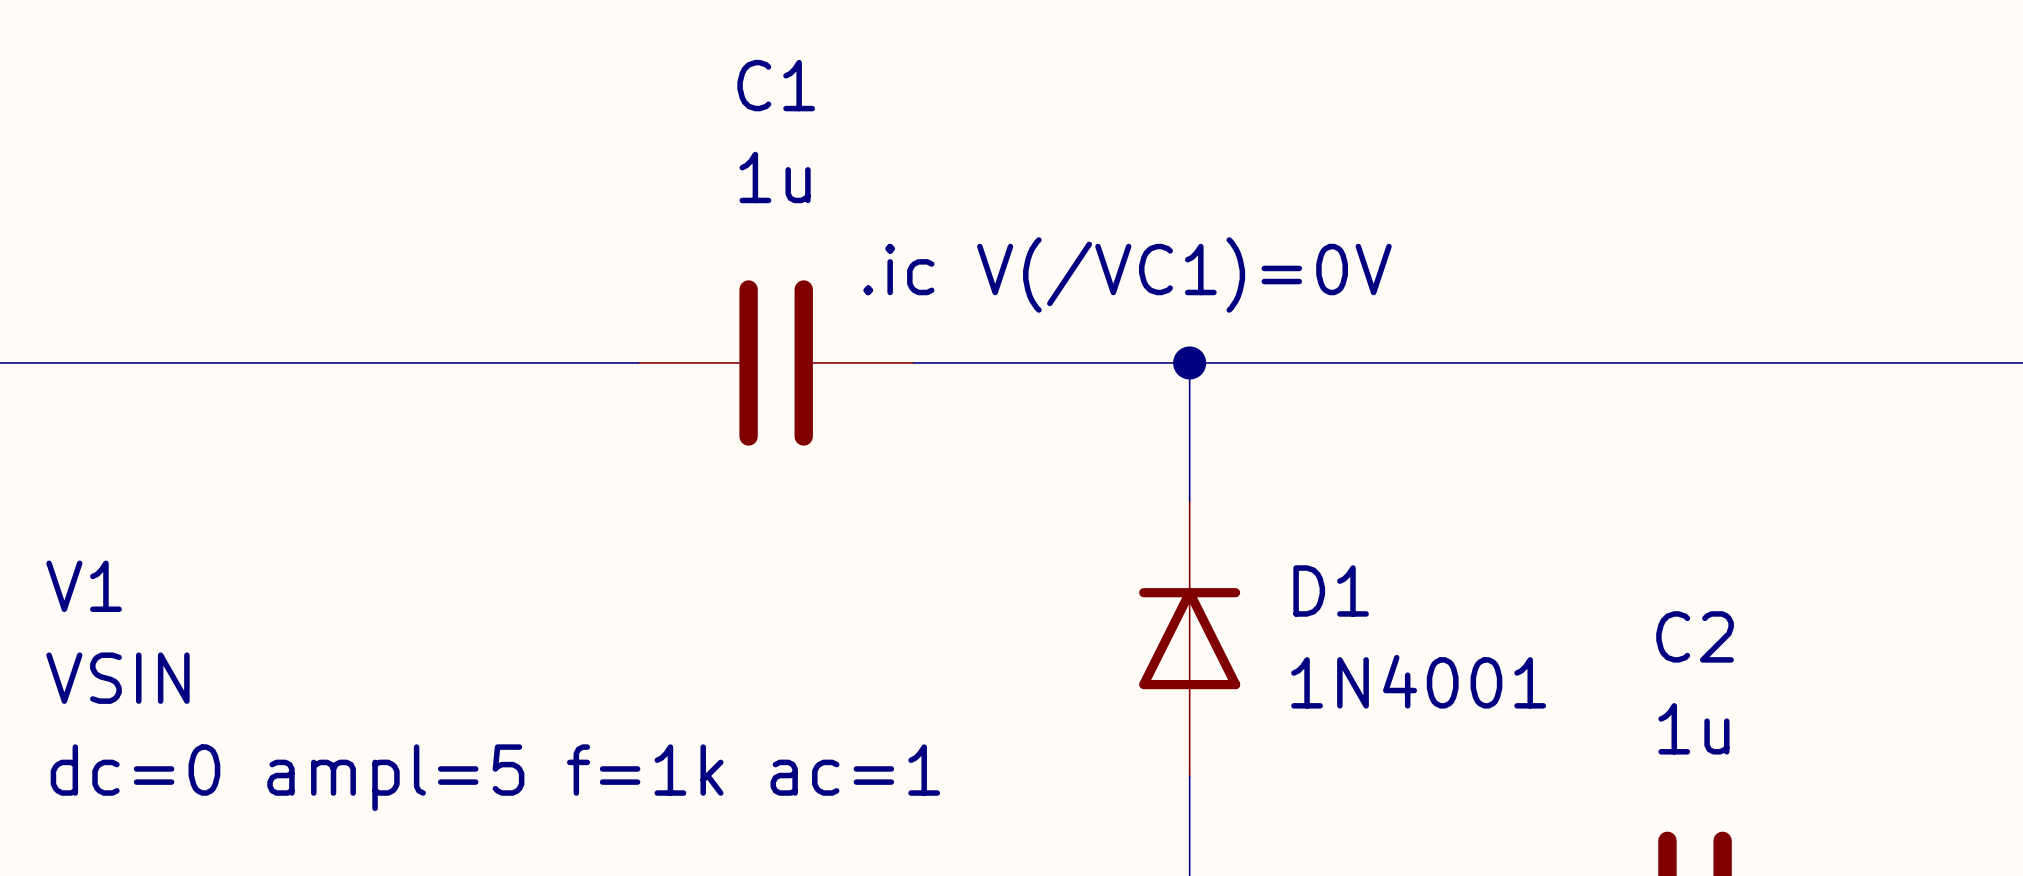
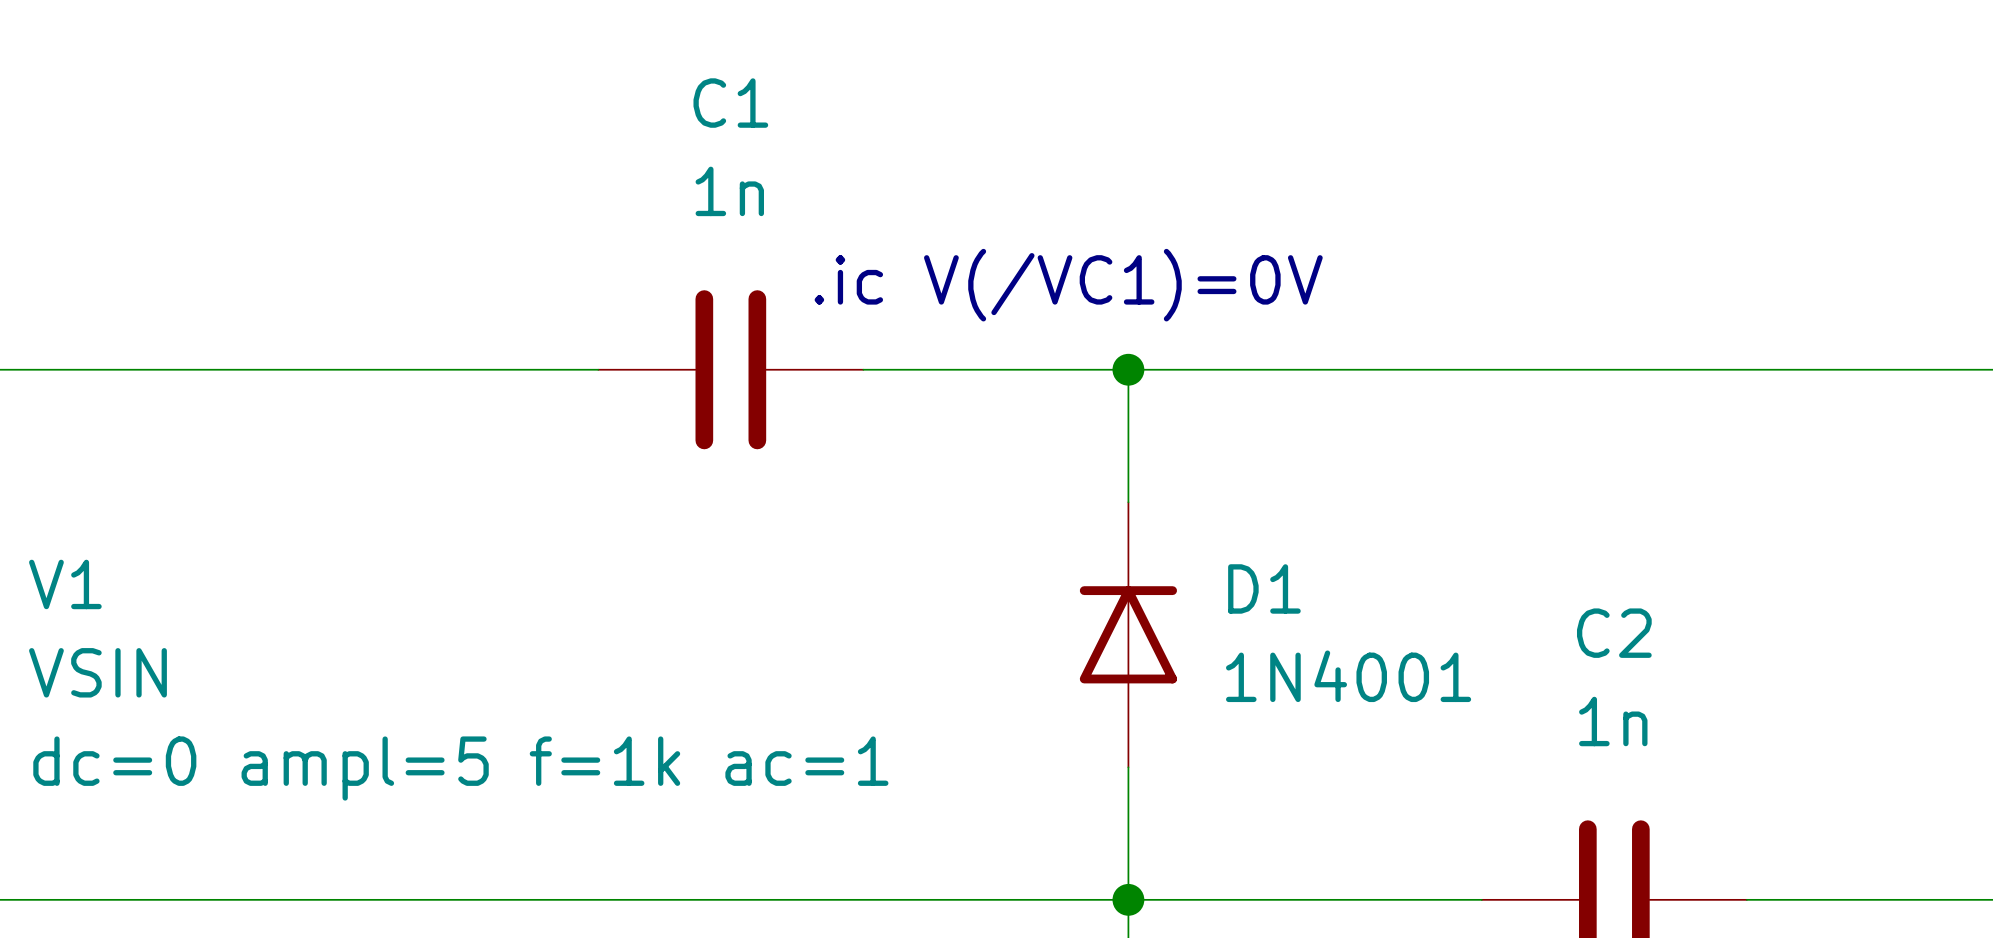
C1 value: 1u (775, 177) -> 1n (729, 191)
C2 value: 1u (1693, 728) -> 1n (1613, 721)

